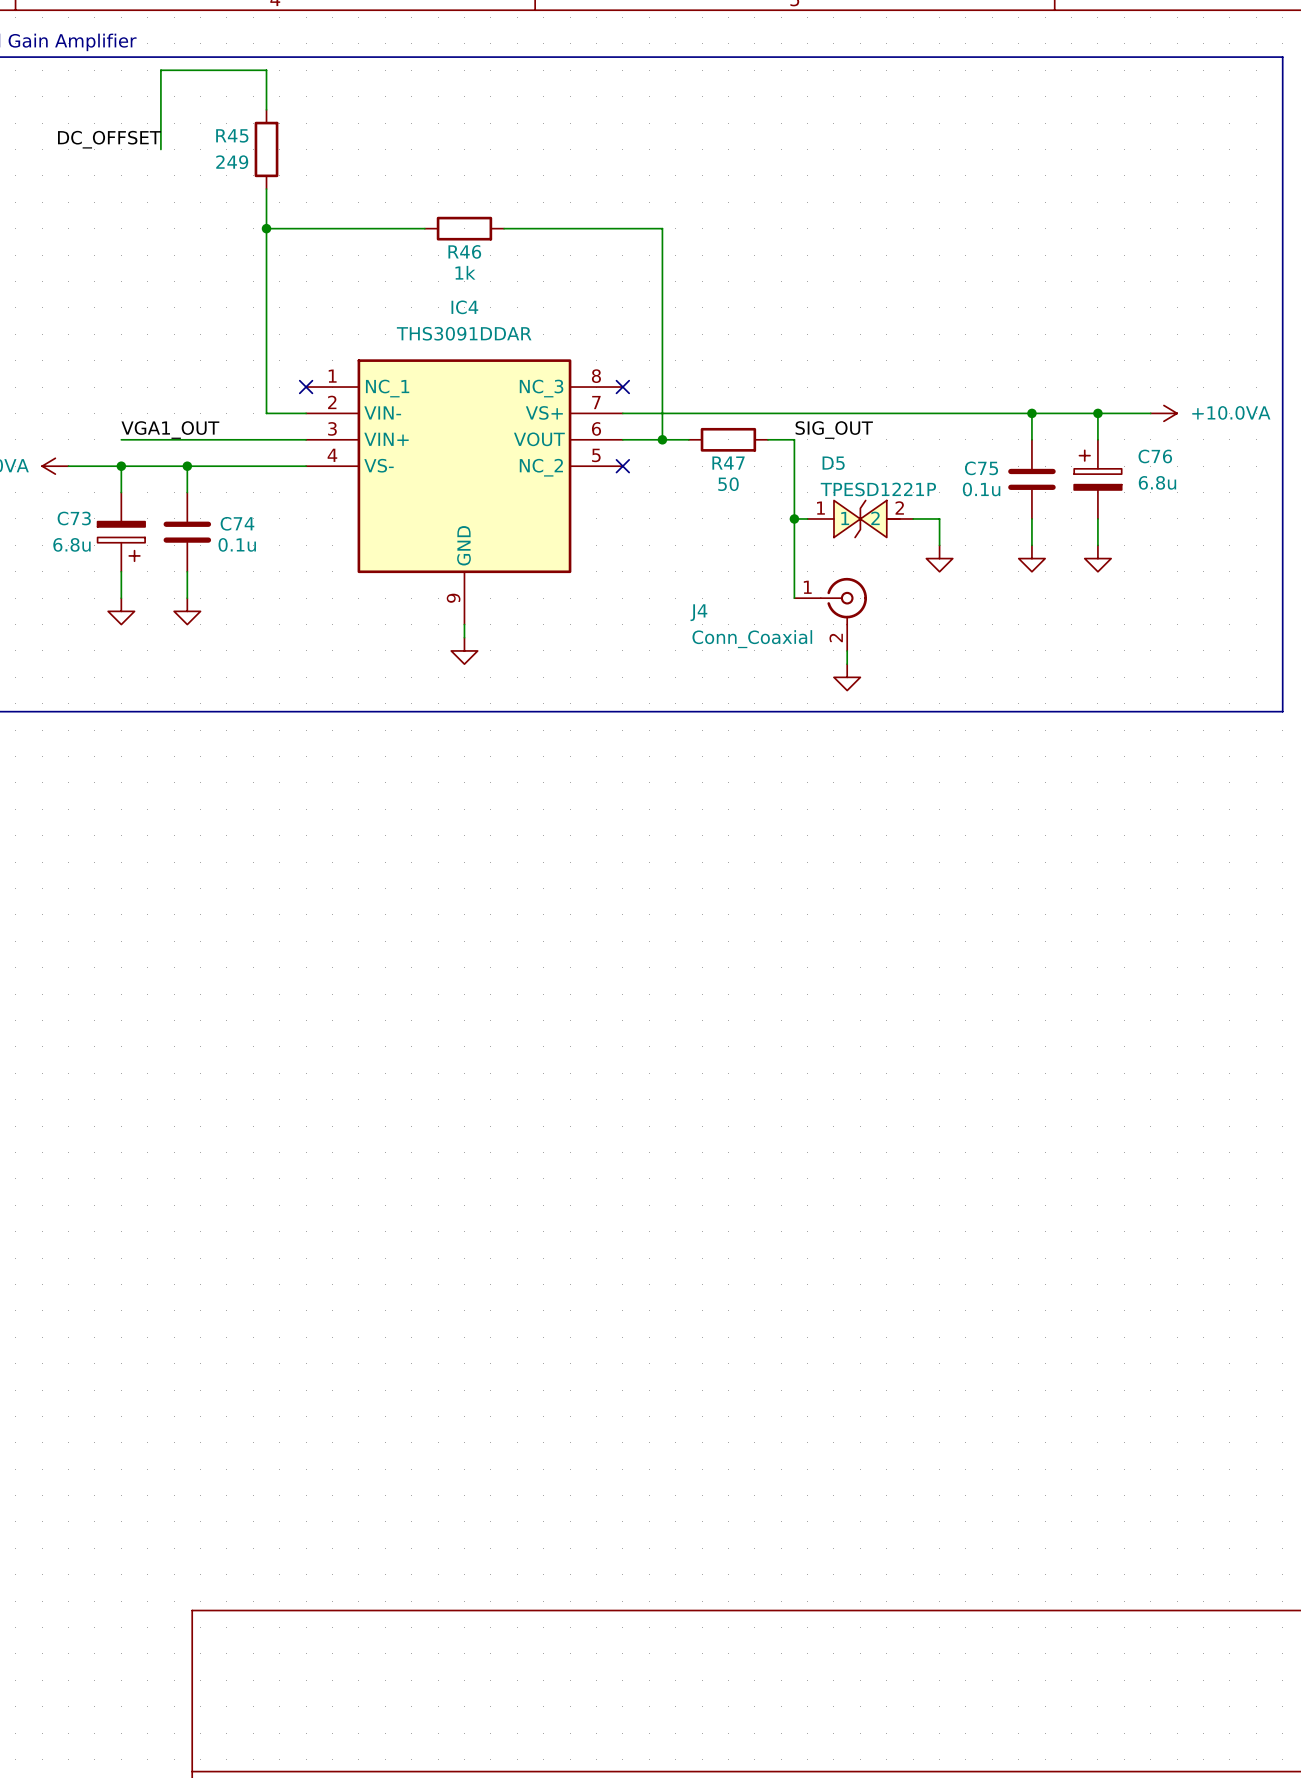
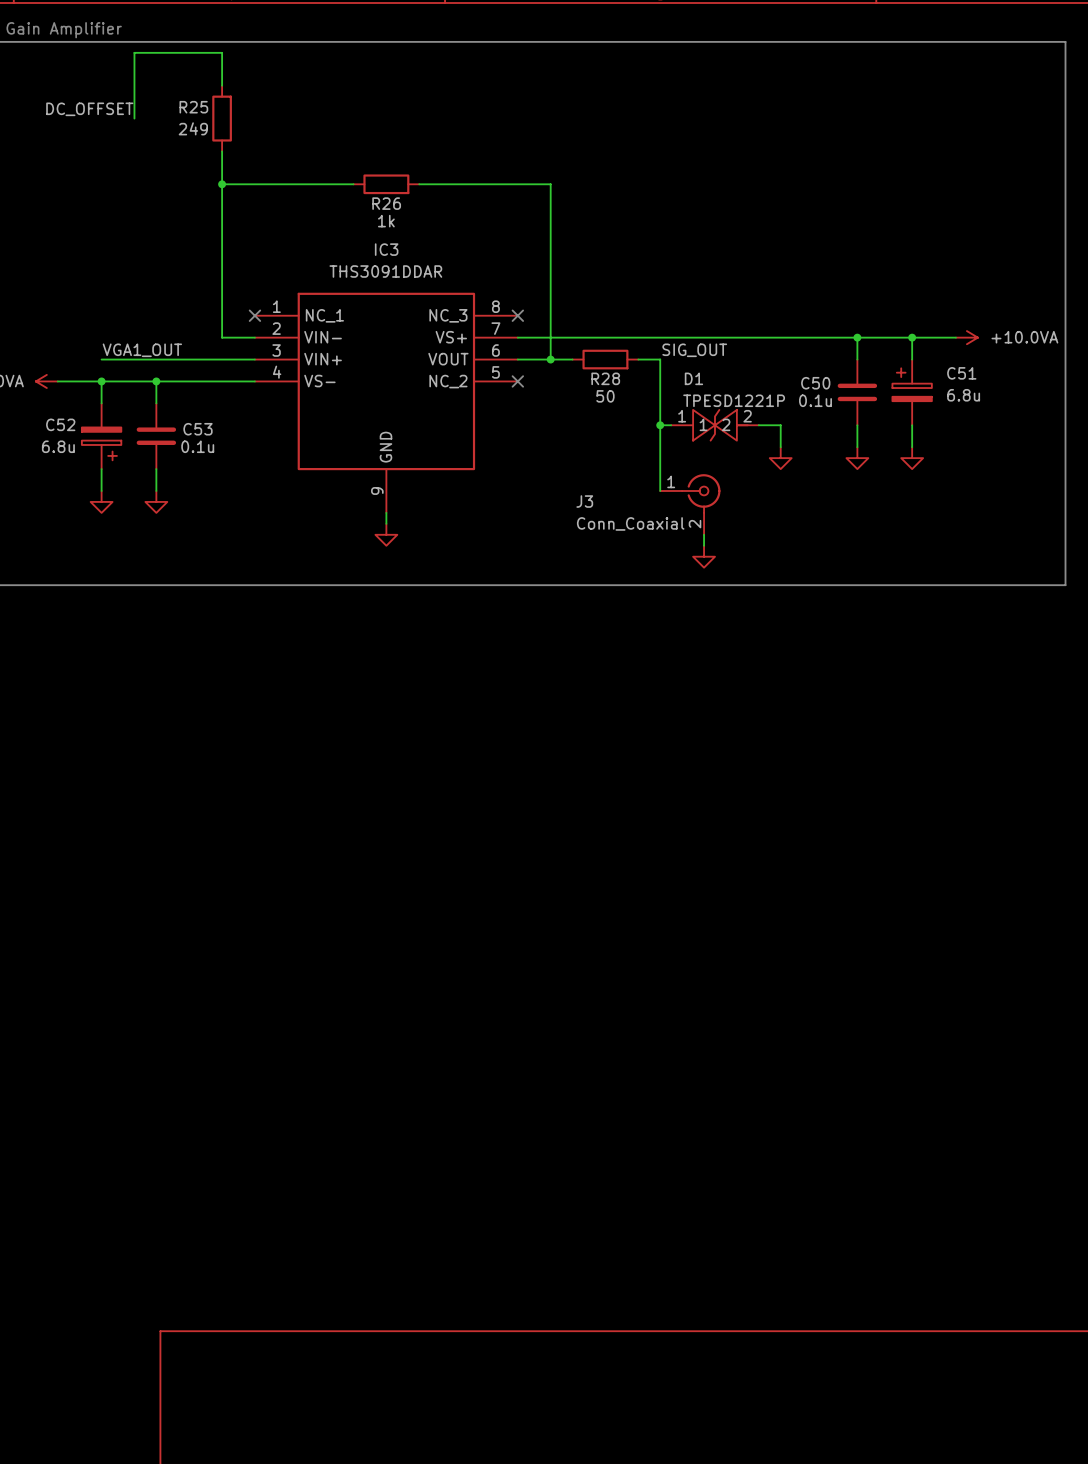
R45 name: R45 (232, 135) -> R25 (193, 107)
R46 name: R46 (464, 251) -> R26 (386, 203)
IC4 name: IC4 (464, 307) -> IC3 (386, 249)
C76 name: C76 (1155, 456) -> C51 (961, 373)
R47 name: R47 (728, 463) -> R28 (605, 378)
D5 name: D5 (833, 463) -> D1 (693, 378)
C75 name: C75 (981, 468) -> C50 (815, 383)
C73 name: C73 (74, 518) -> C52 (60, 424)
C74 name: C74 (237, 523) -> C53 (197, 429)
J4 name: J4 (698, 612) -> J3 (584, 501)

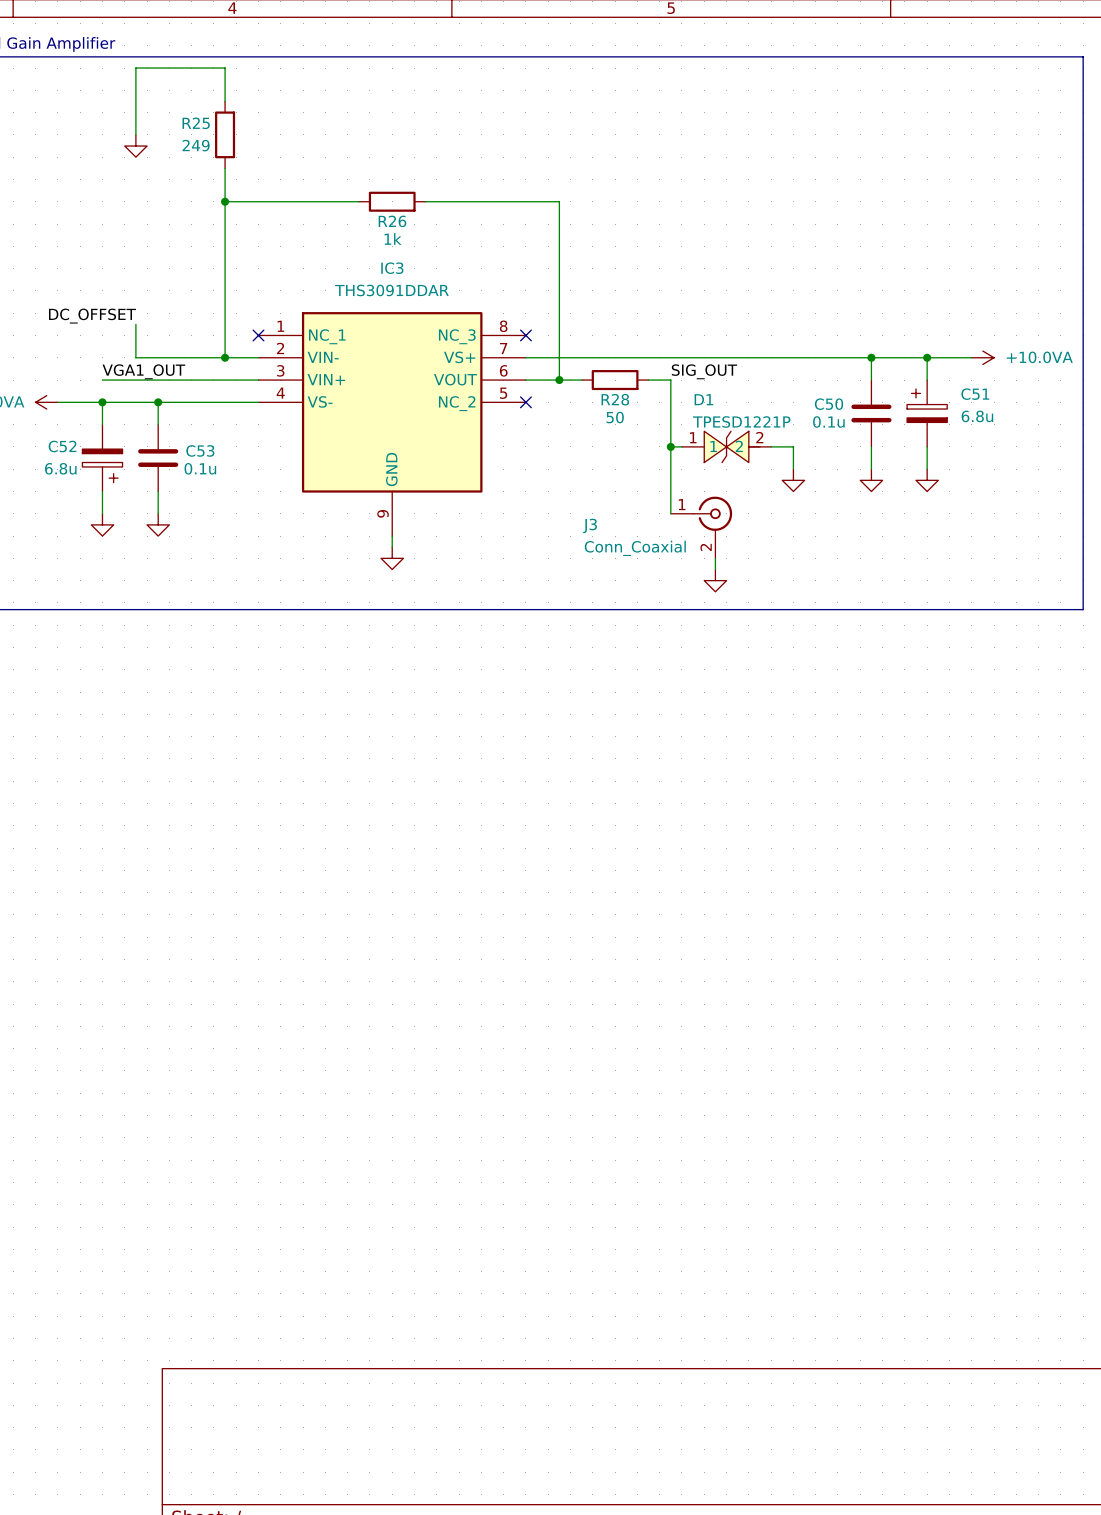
label position: DC_OFFSET (89, 109) -> DC_OFFSET (92, 316)
power symbol: none -> (135, 146)
wire: none -> (135, 324) (135, 357) (225, 357)
junction: none -> (225, 357)

